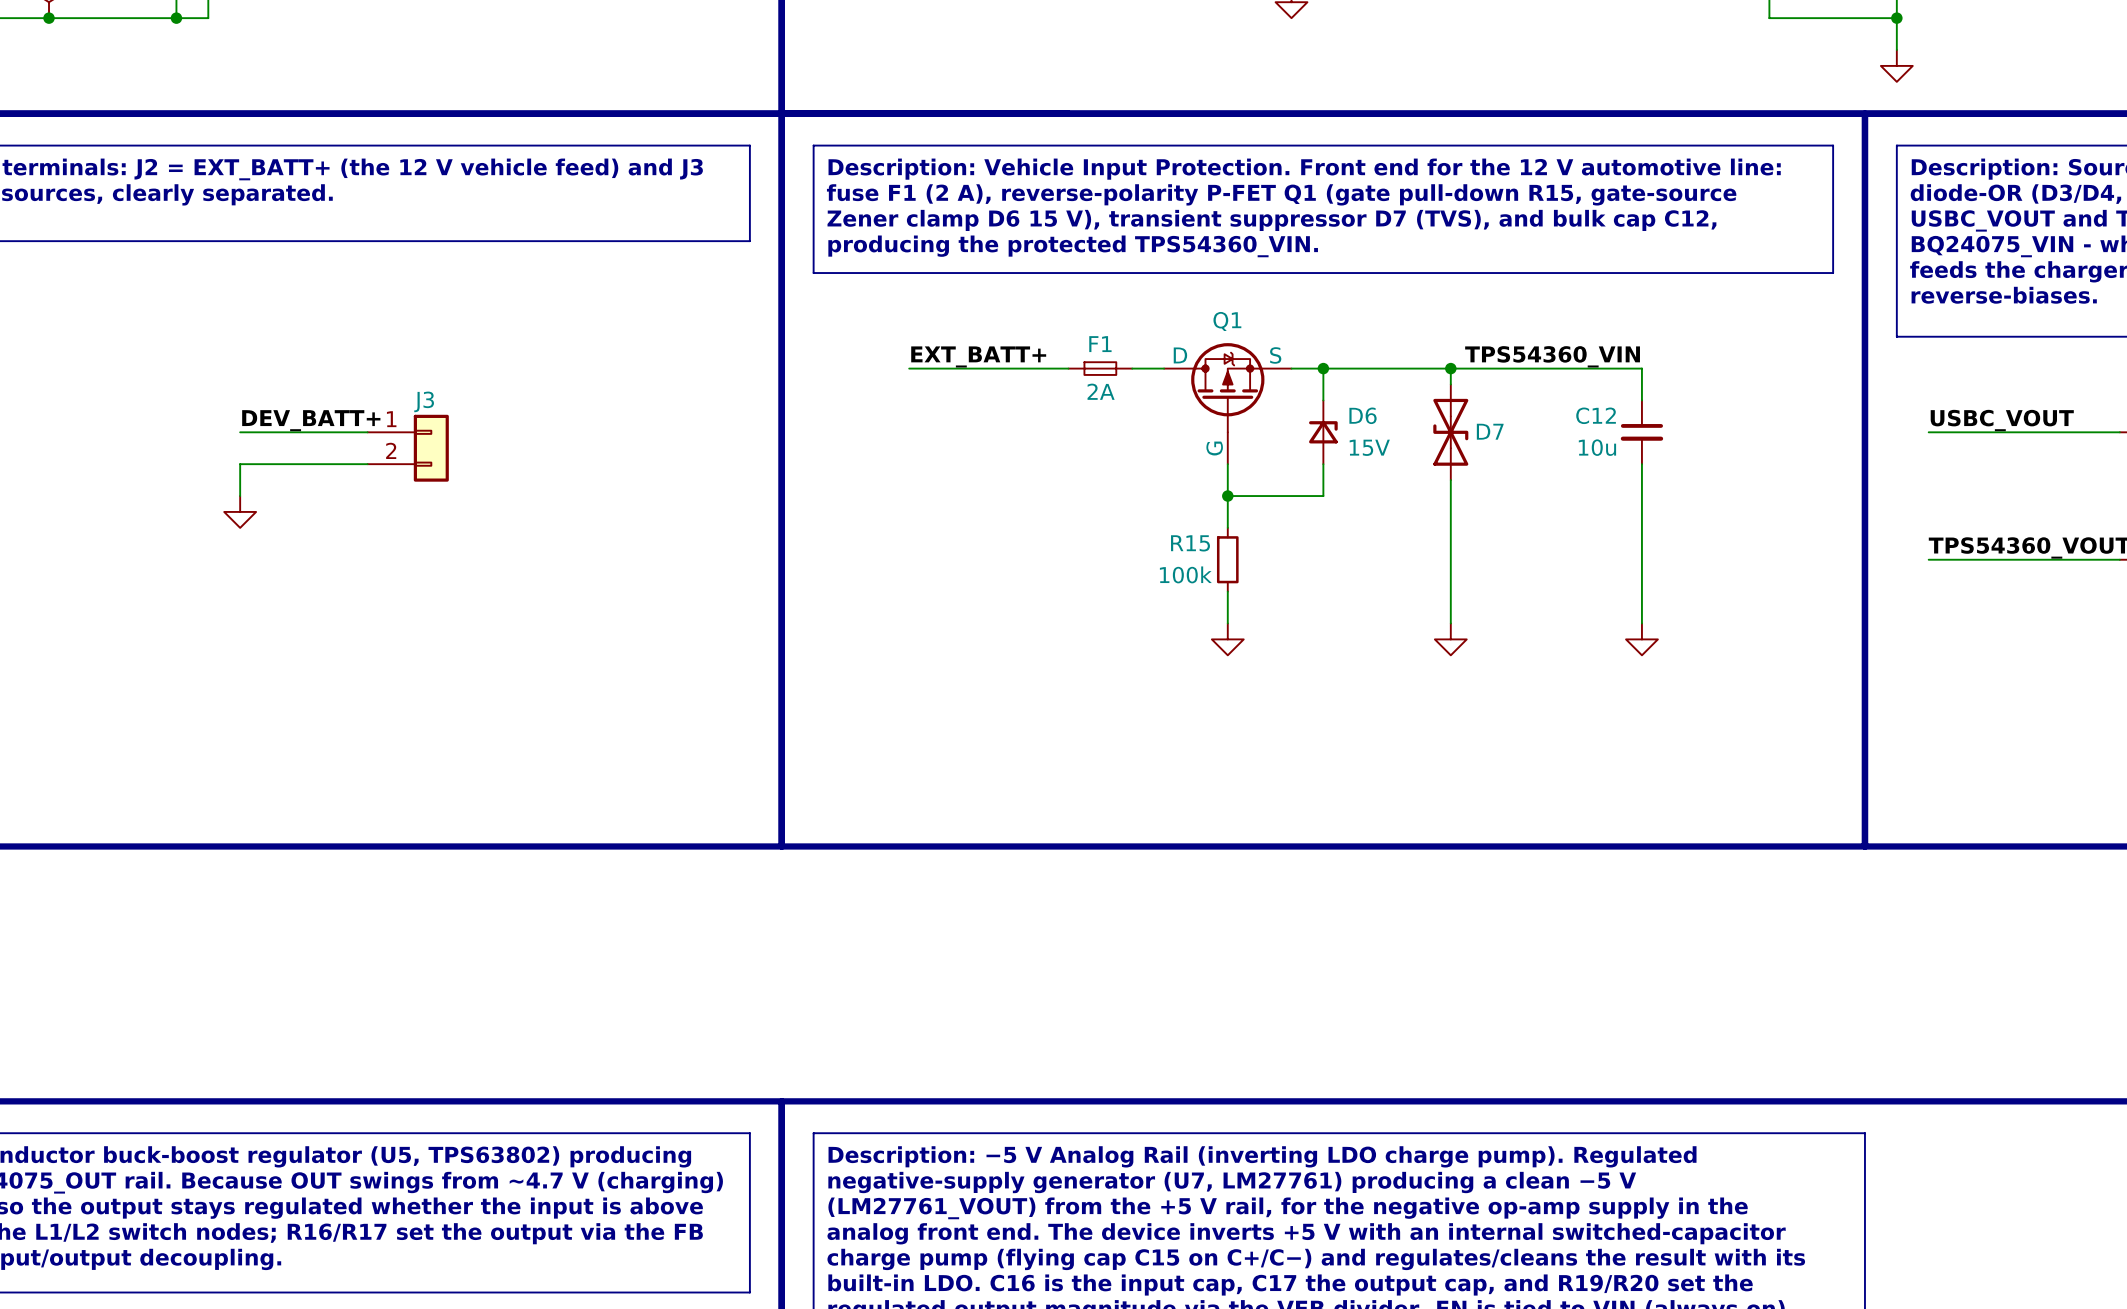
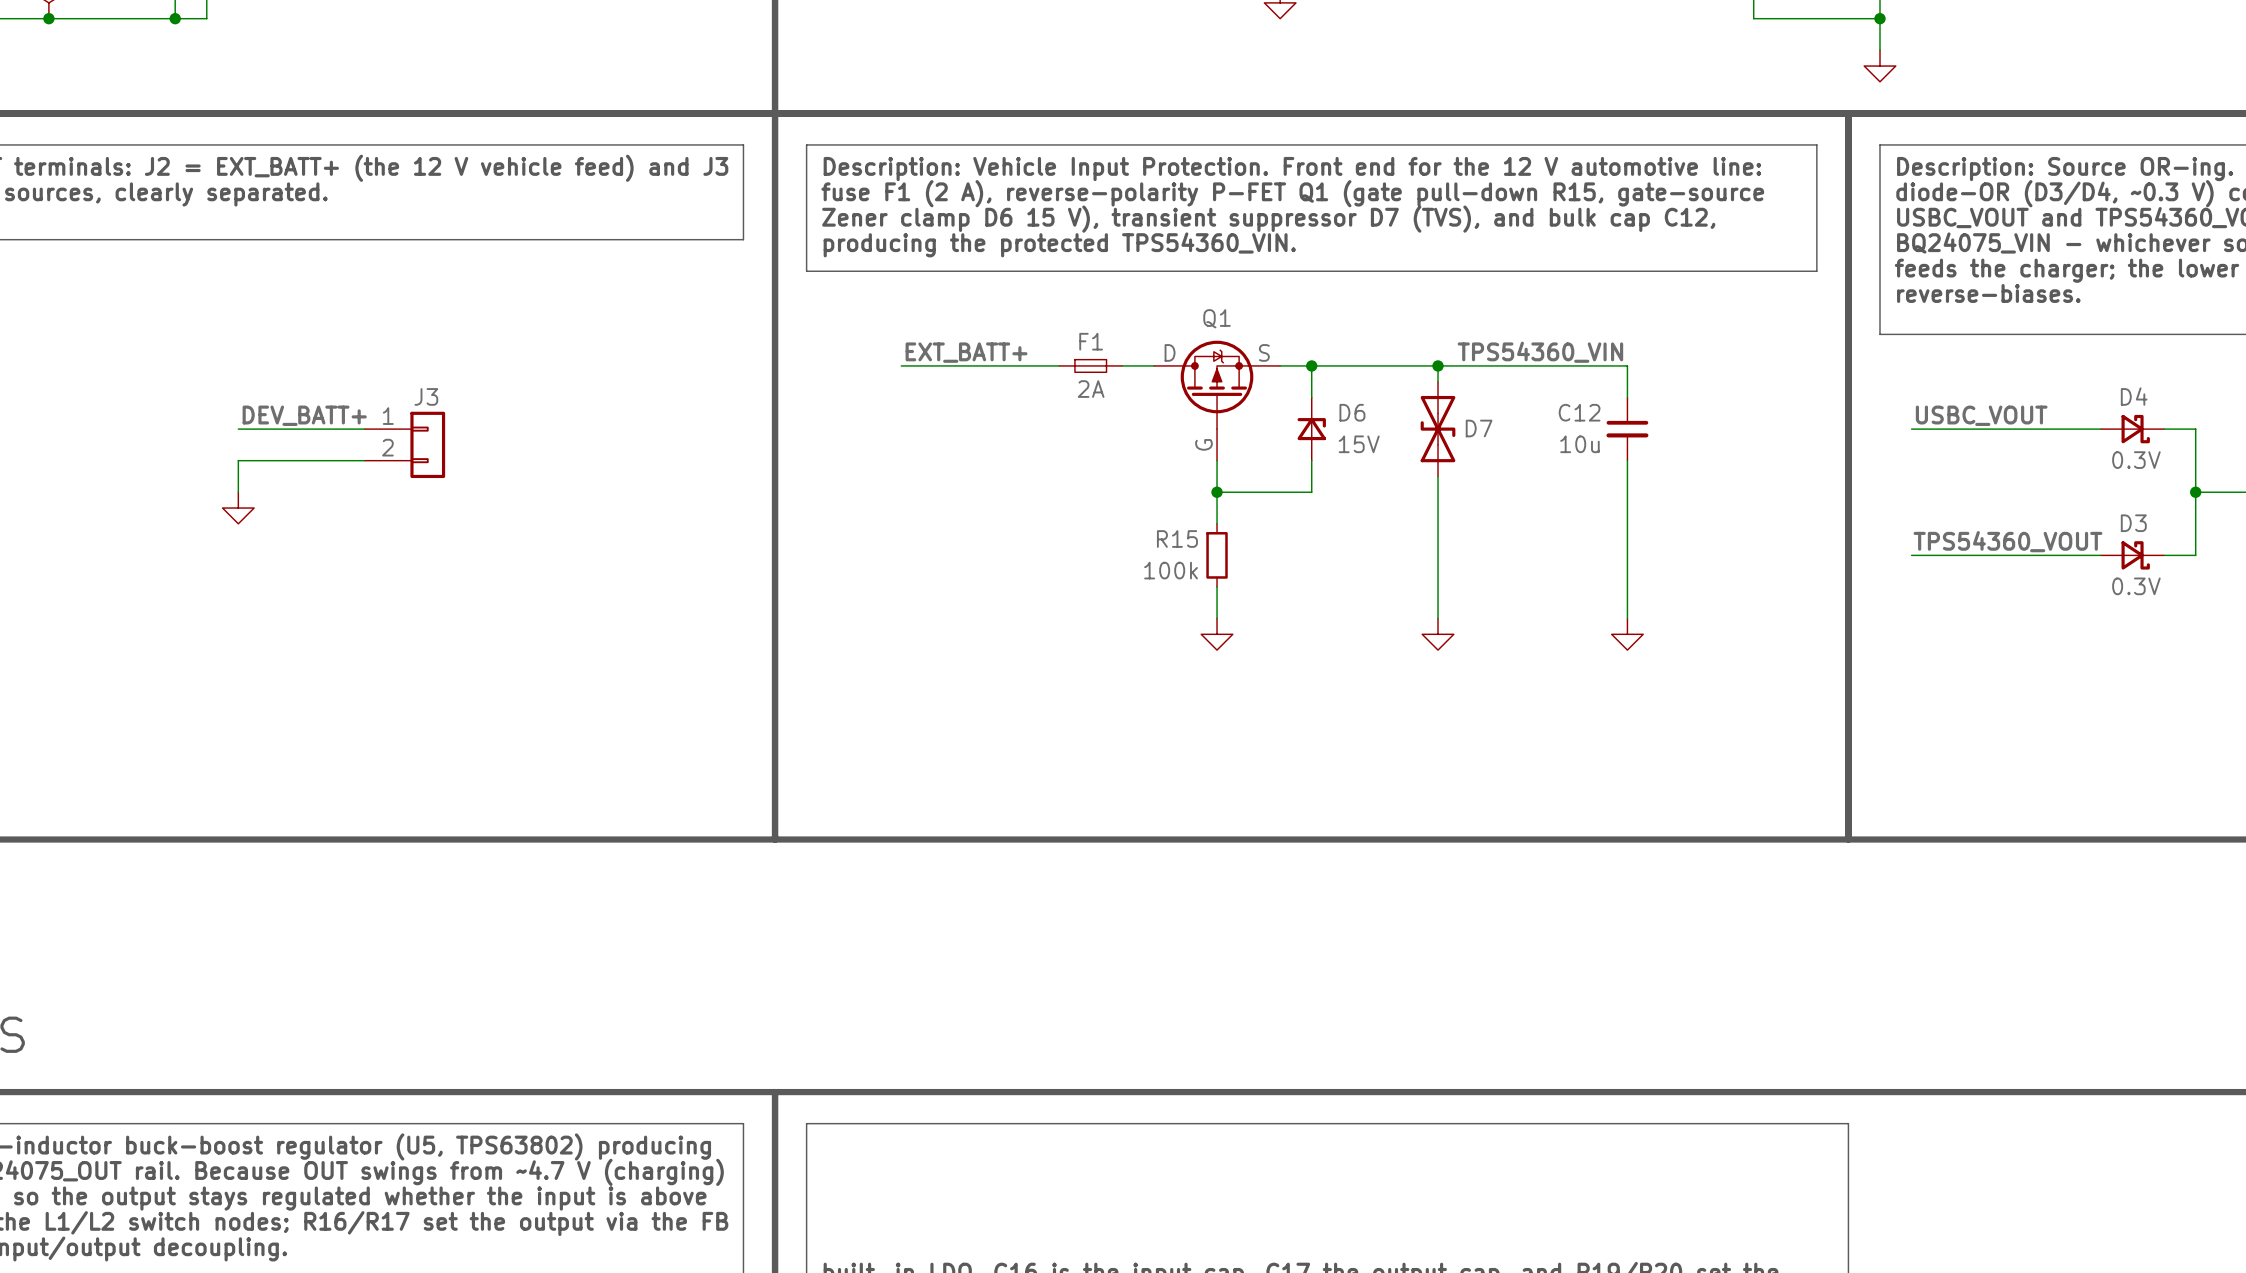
text: Description: −5 V Analog Rail (inverting LDO charge pump). Regulated (1262, 1156) -> none
text: negative-supply generator (U7, LM27761) producing a clean −5 V (1232, 1182) -> none
text: (LM27761_VOUT) from the +5 V rail, for the negative op-amp supply in the (1288, 1208) -> none
text: analog front end. The device inverts +5 V with an internal switched-capacitor (1306, 1233) -> none
text: charge pump (flying cap C15 on C+/C−) and regulates/cleans the result with its (1316, 1259) -> none

